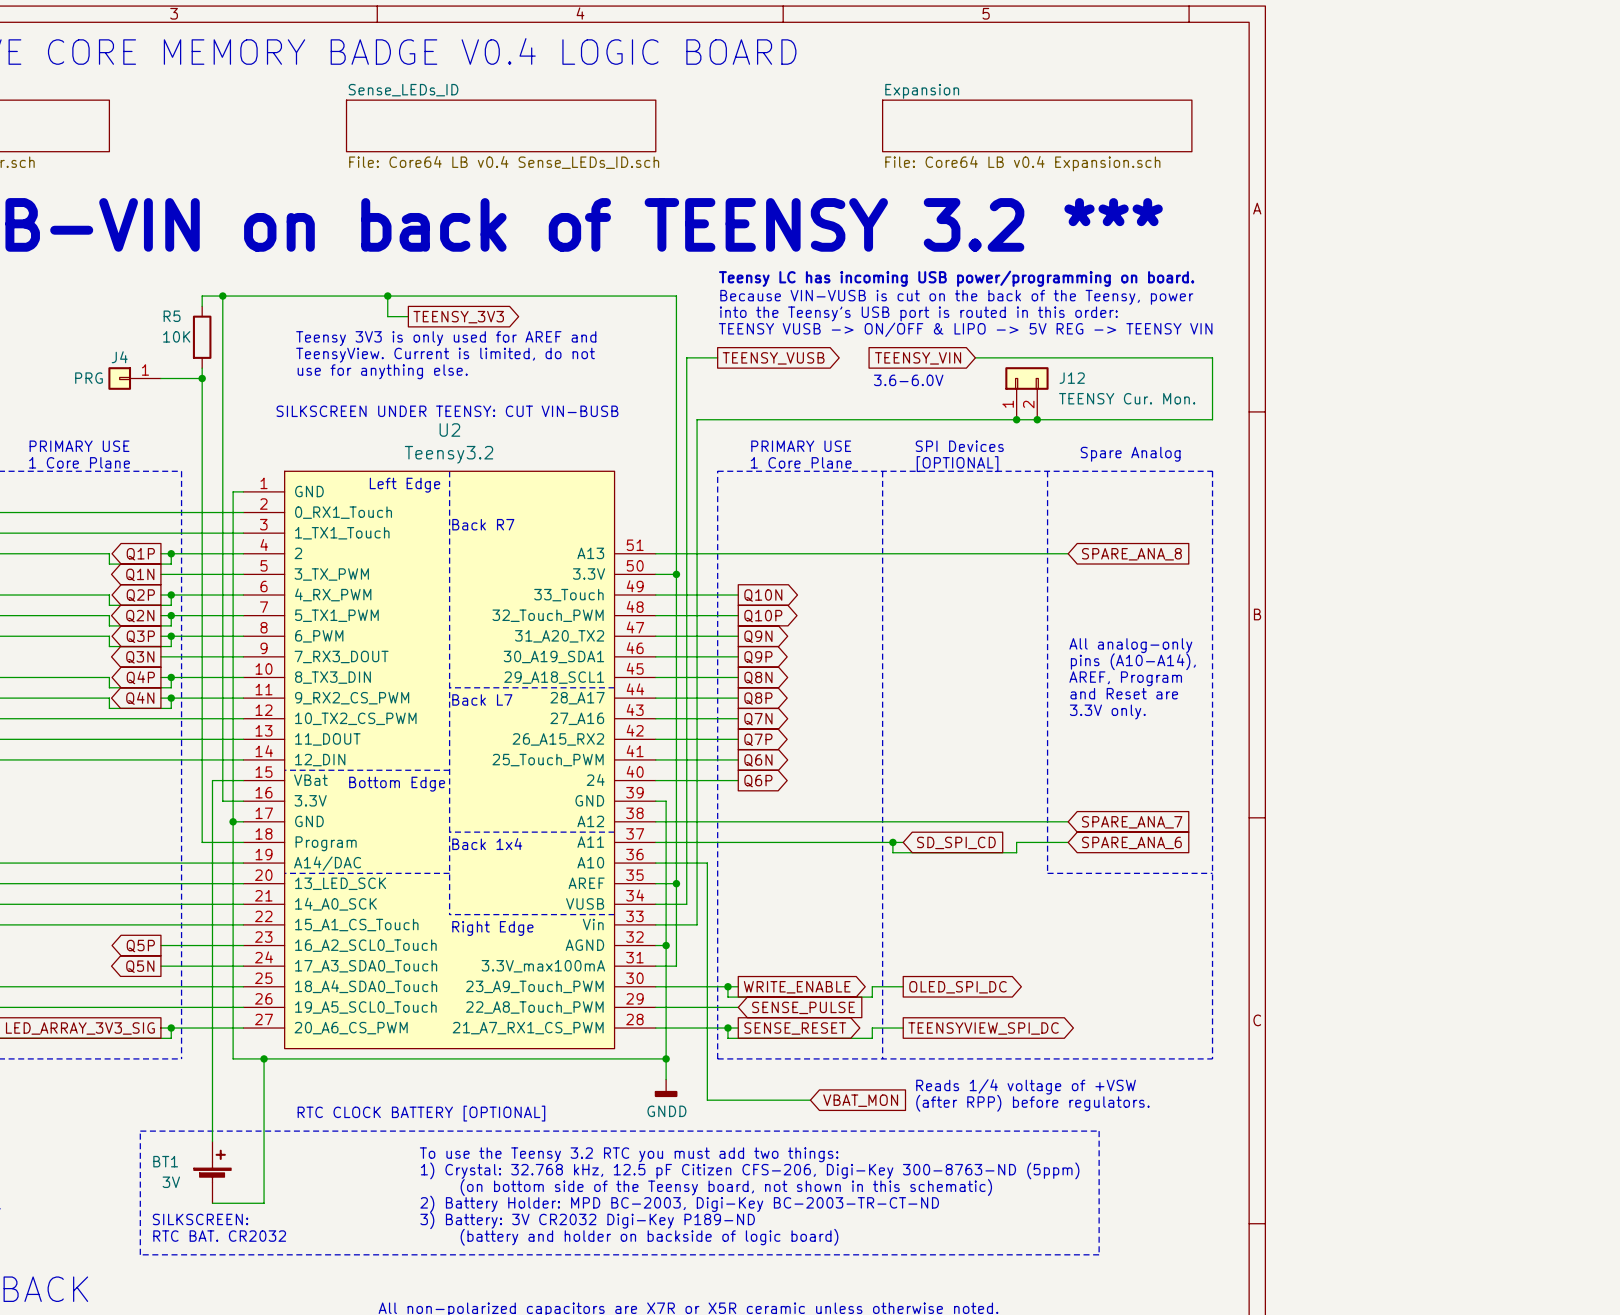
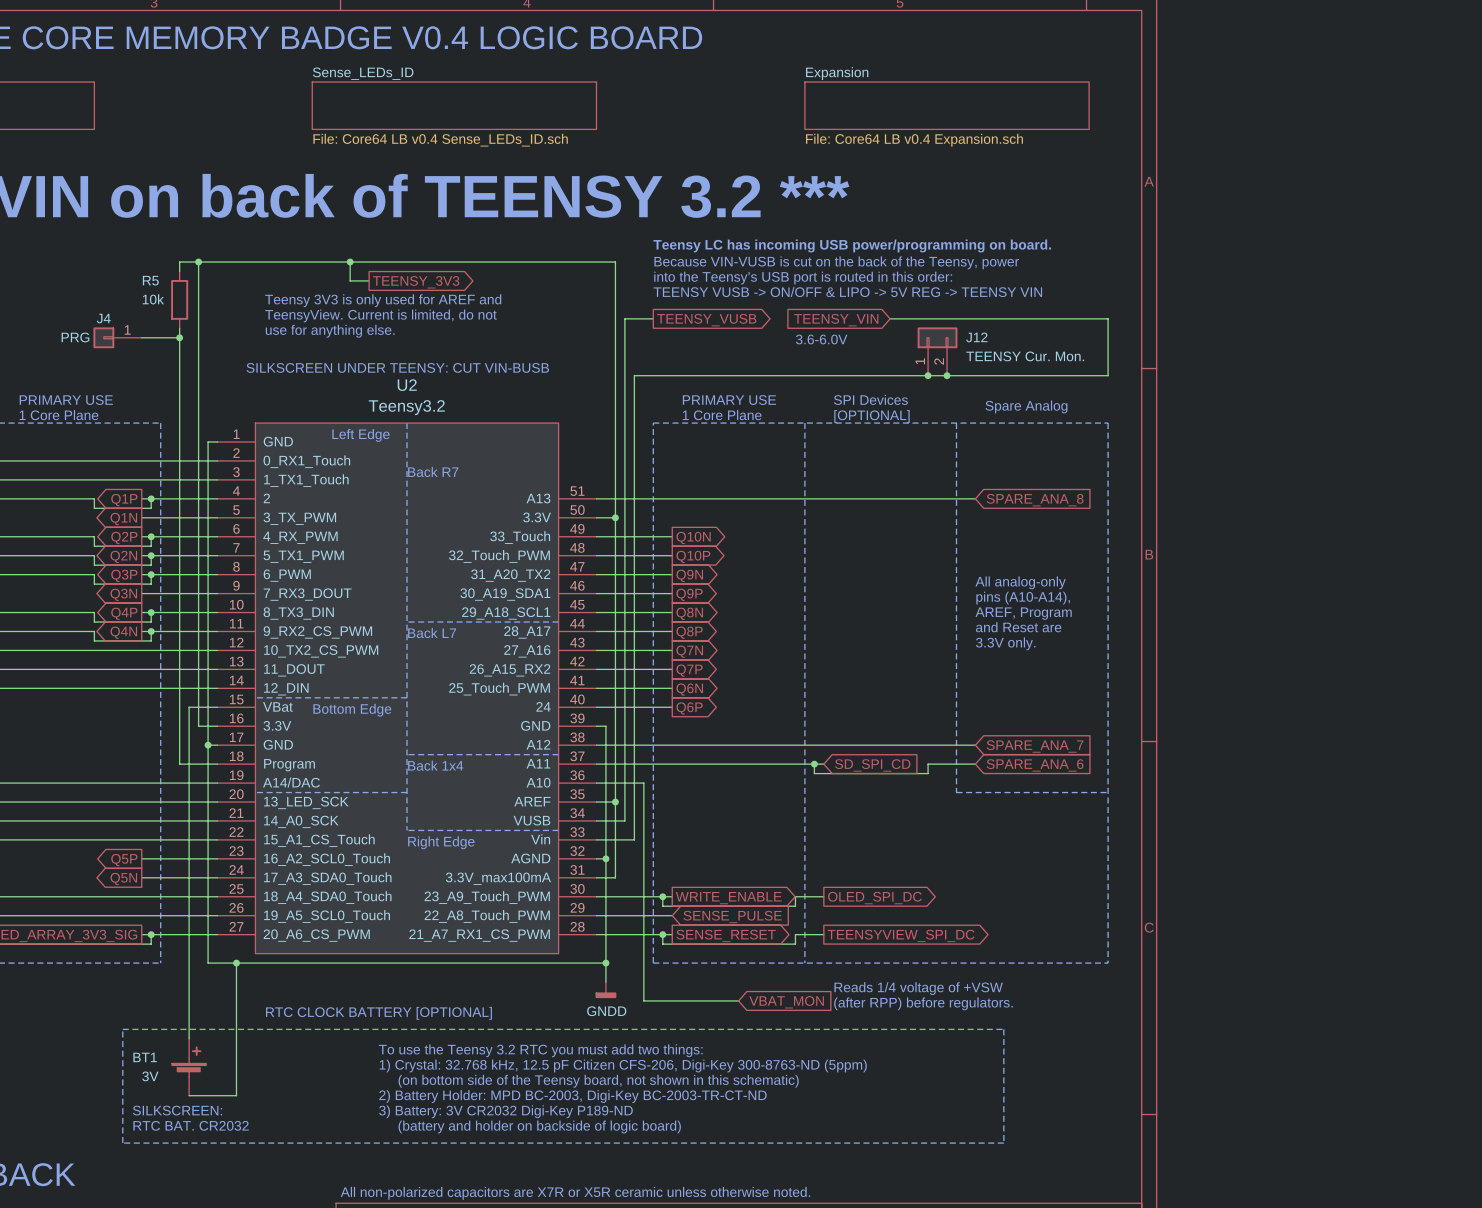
R5 value: 10K (176, 336) -> 10k (153, 299)

